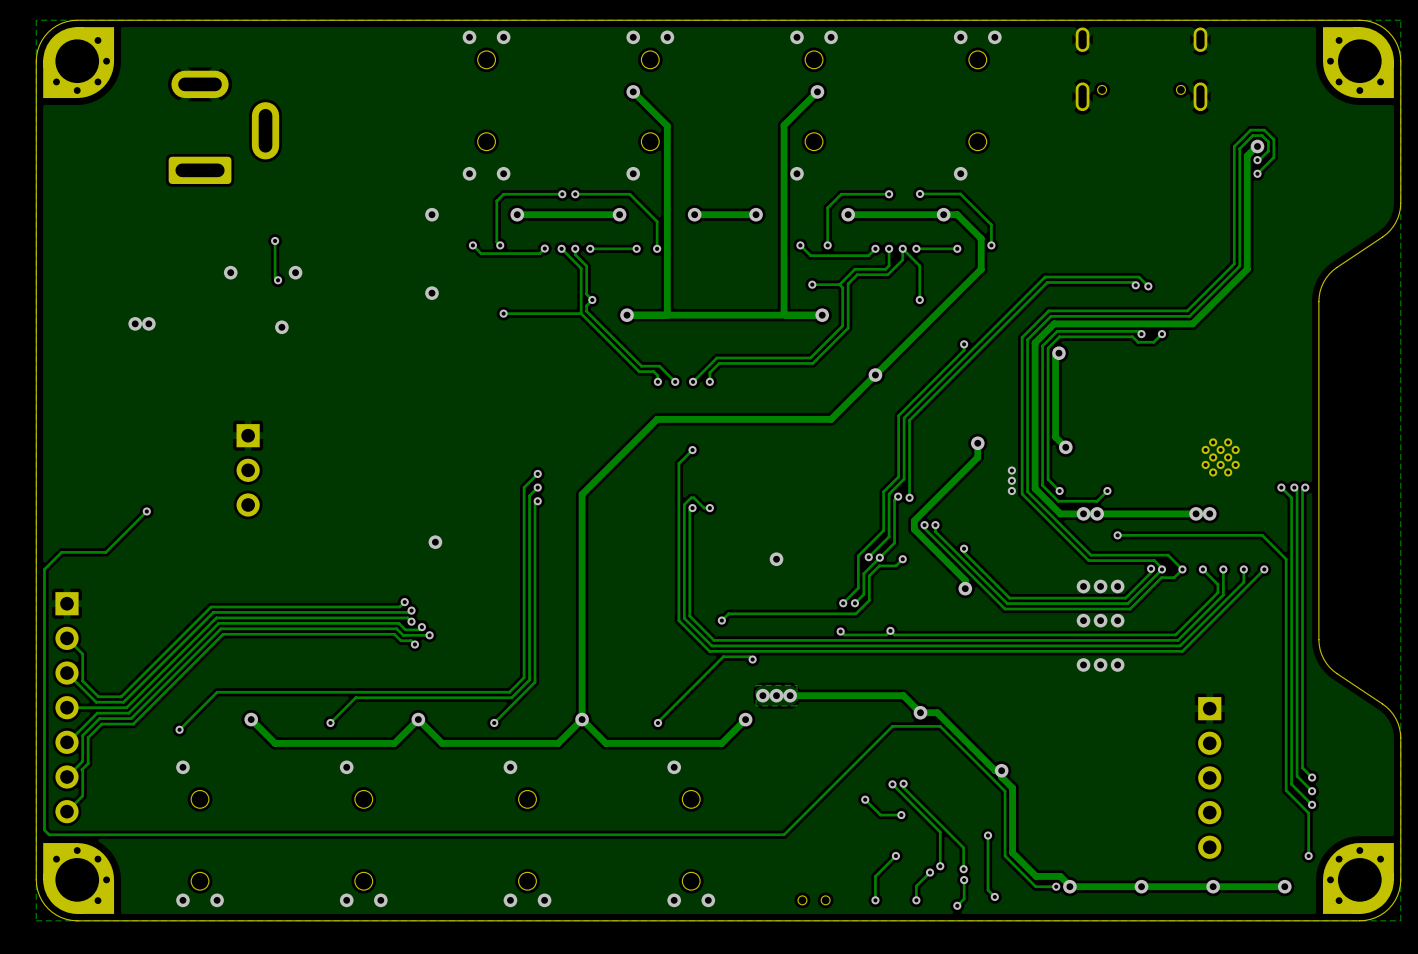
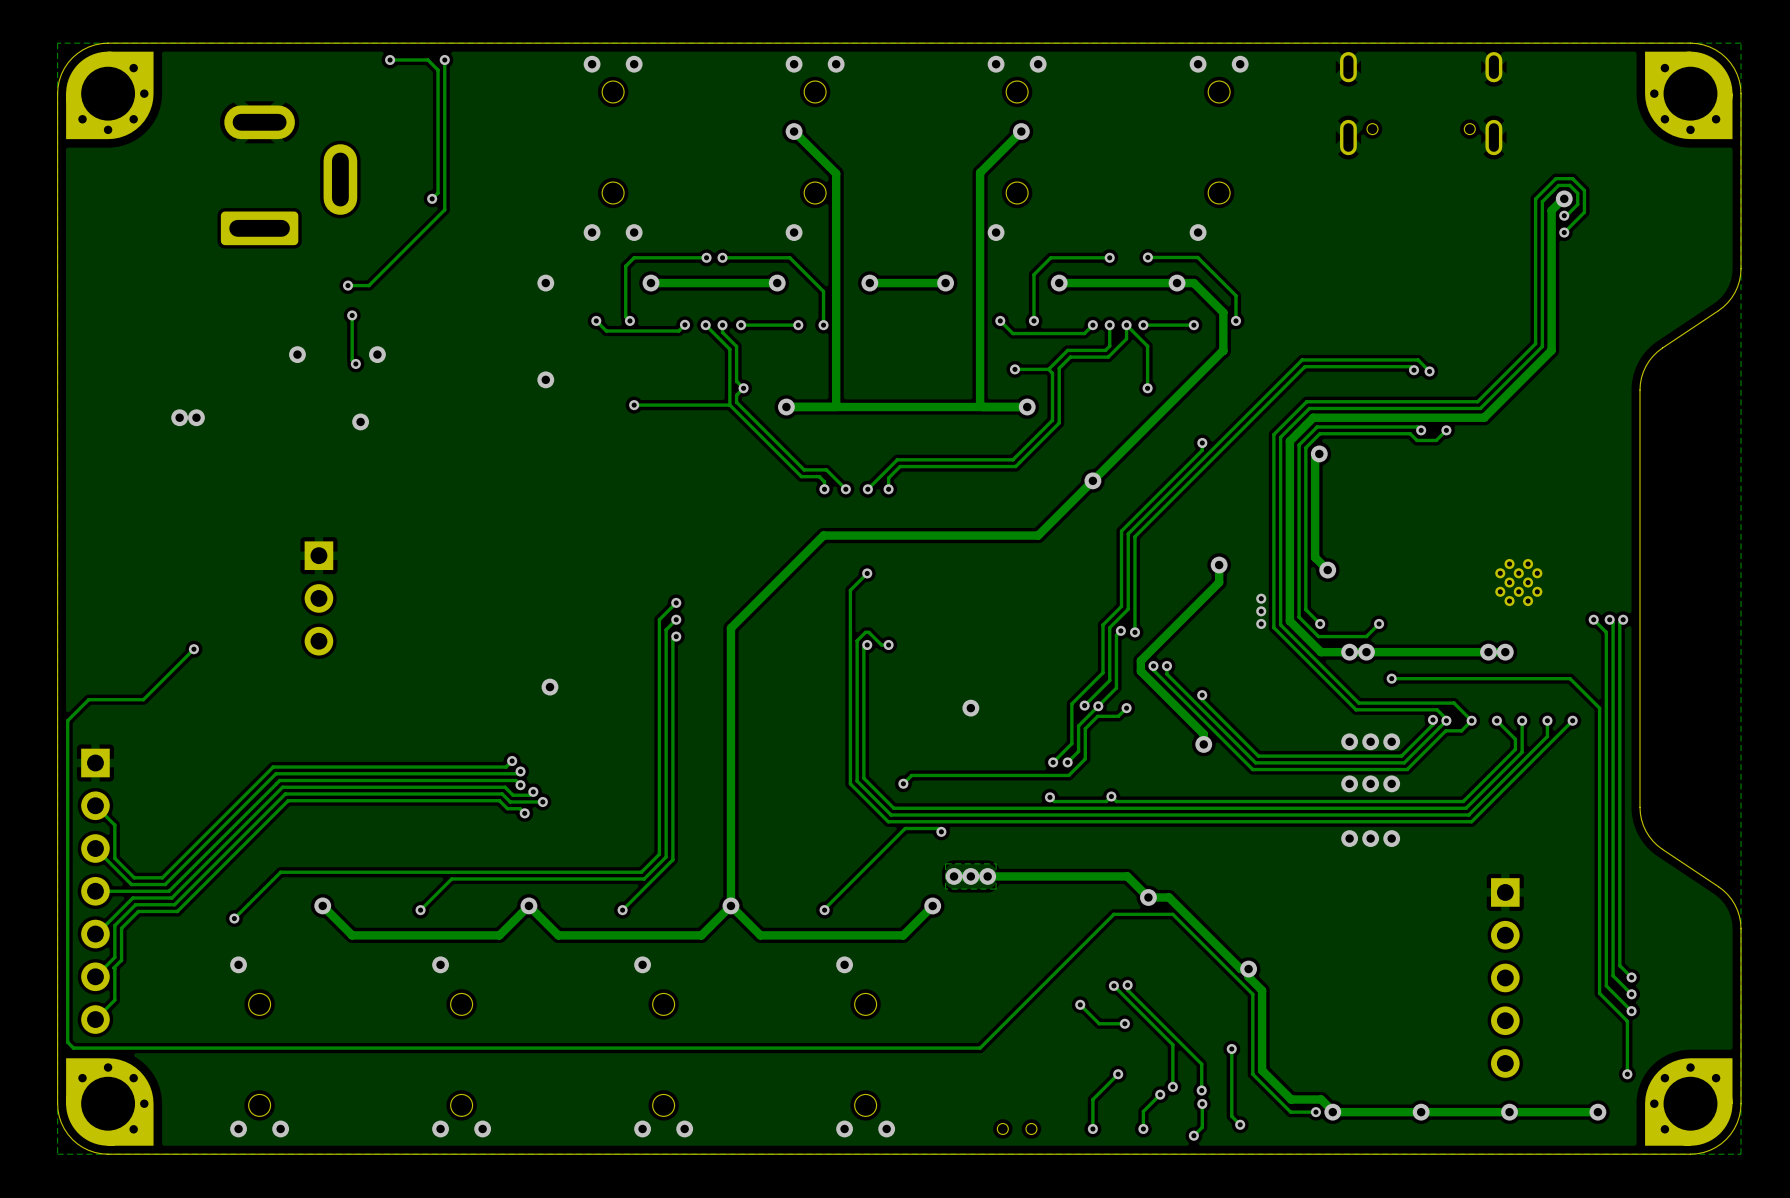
track: none -> (390, 60) (427, 60) (438, 70) (438, 192) (432, 198)
via: none -> (390, 60)
track: none -> (444, 60) (444, 209) (369, 285) (347, 285)
via: none -> (444, 60)
via: none -> (432, 198)
via: none -> (347, 285)

